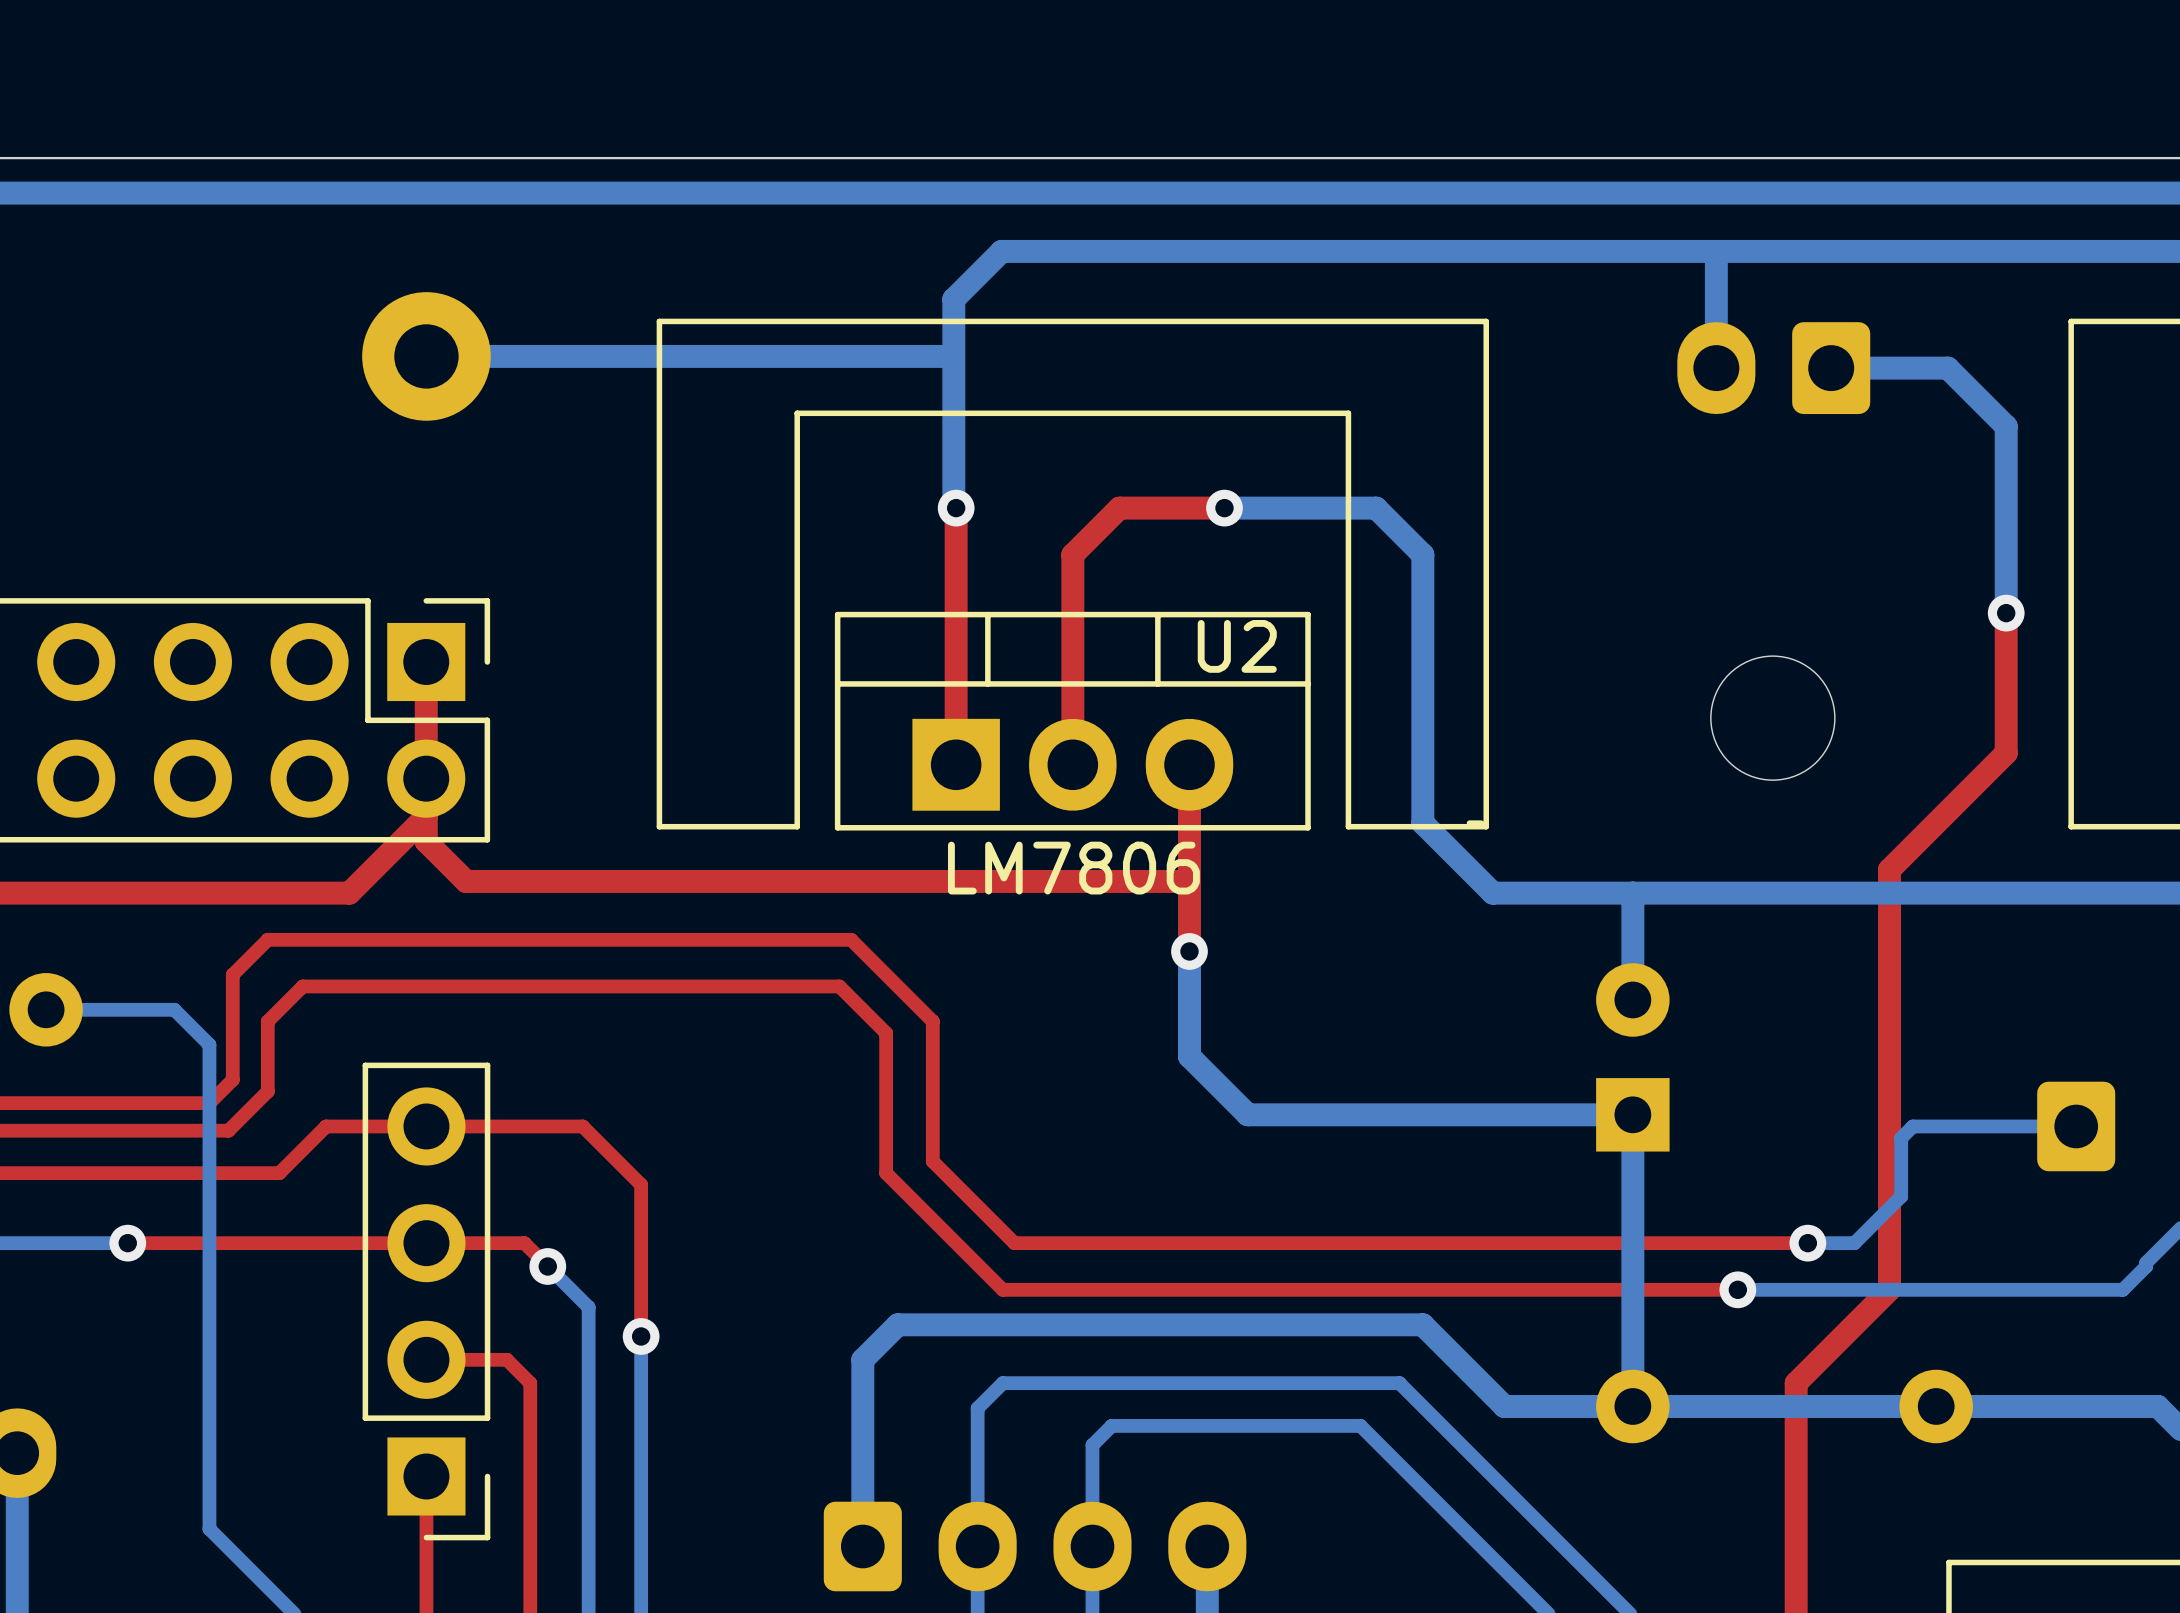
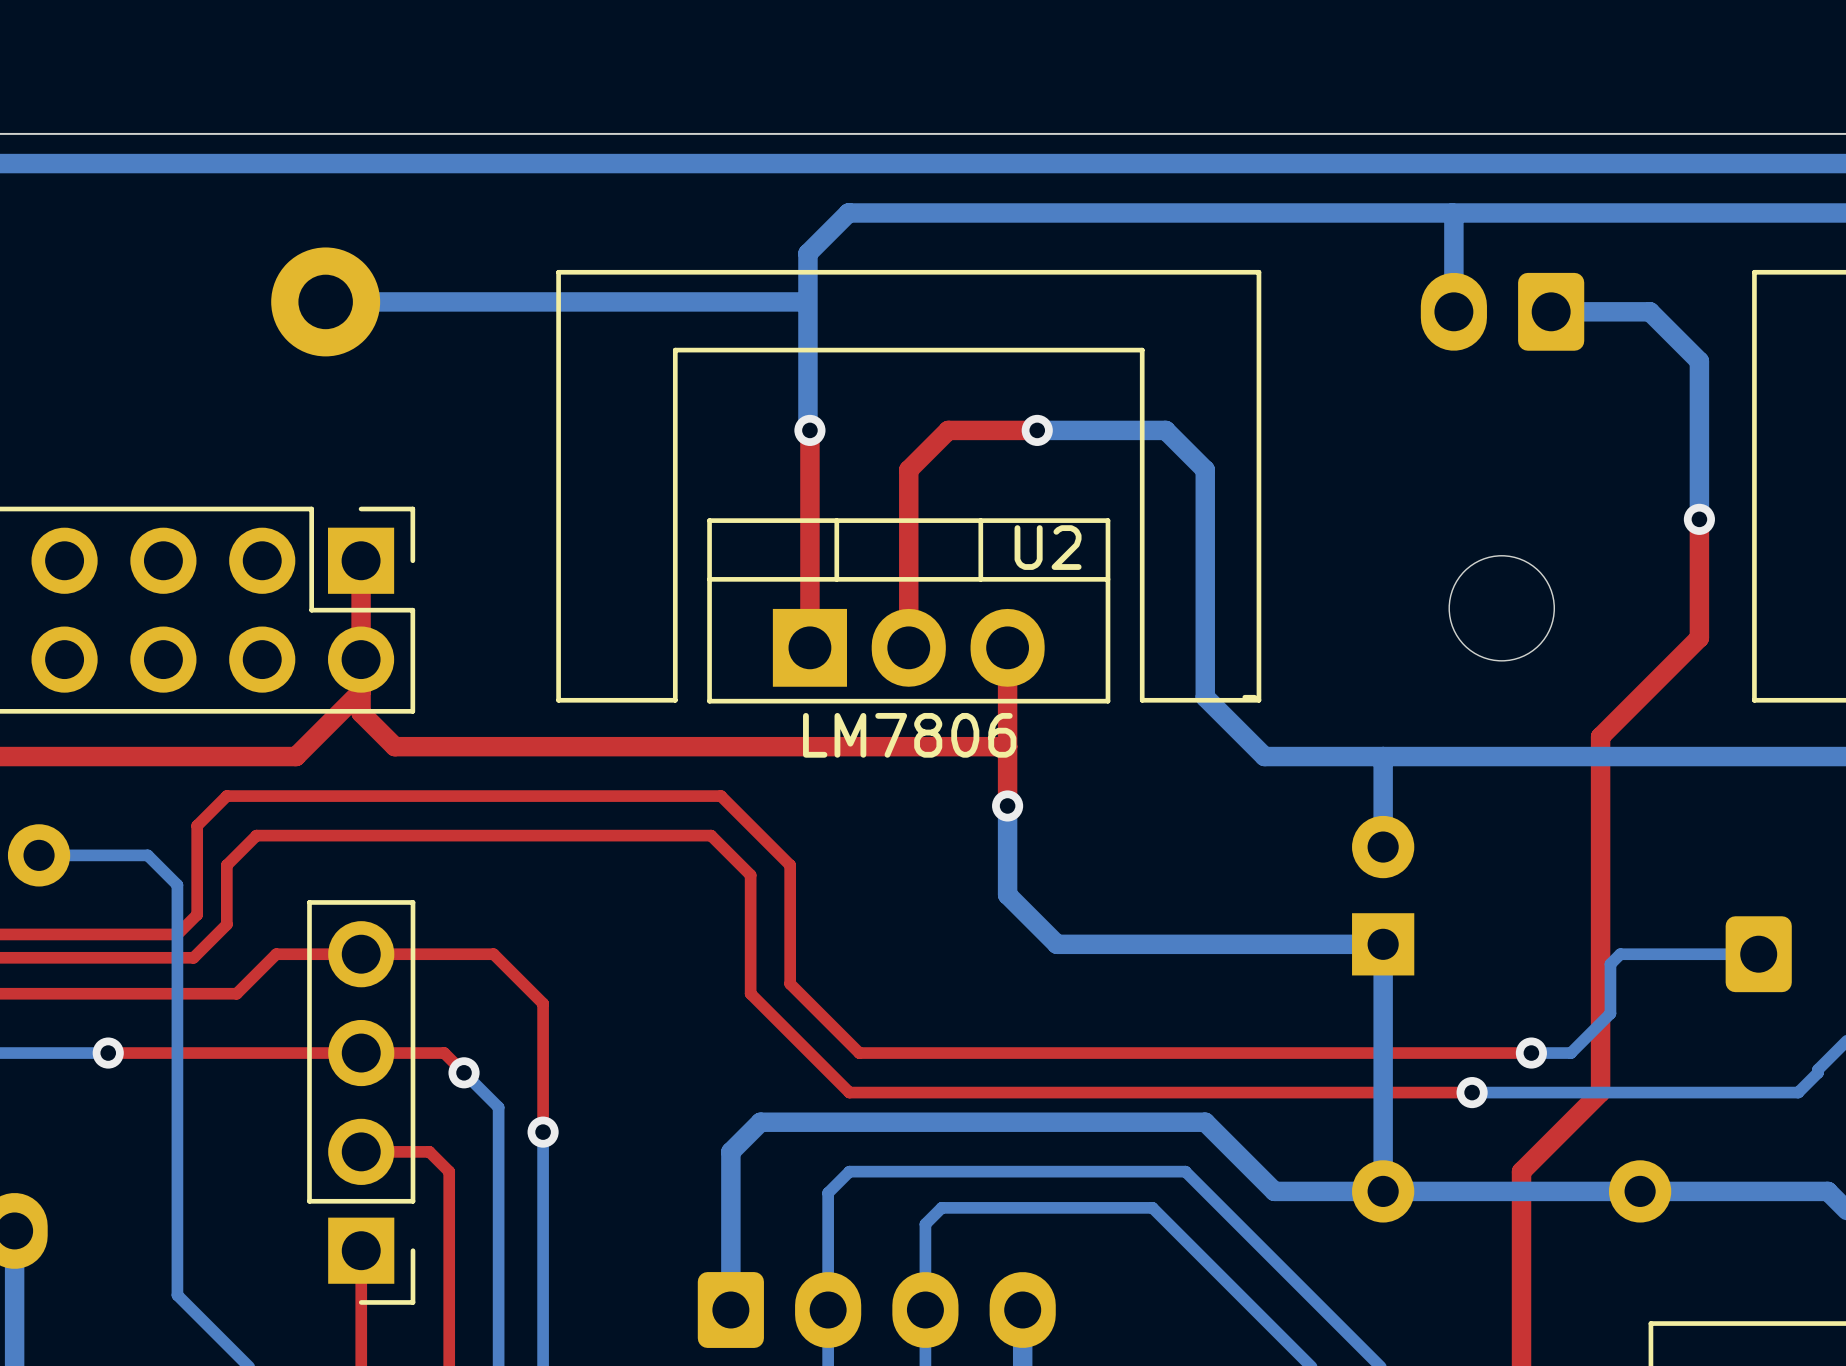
part position: (426, 356) -> (325, 301)

